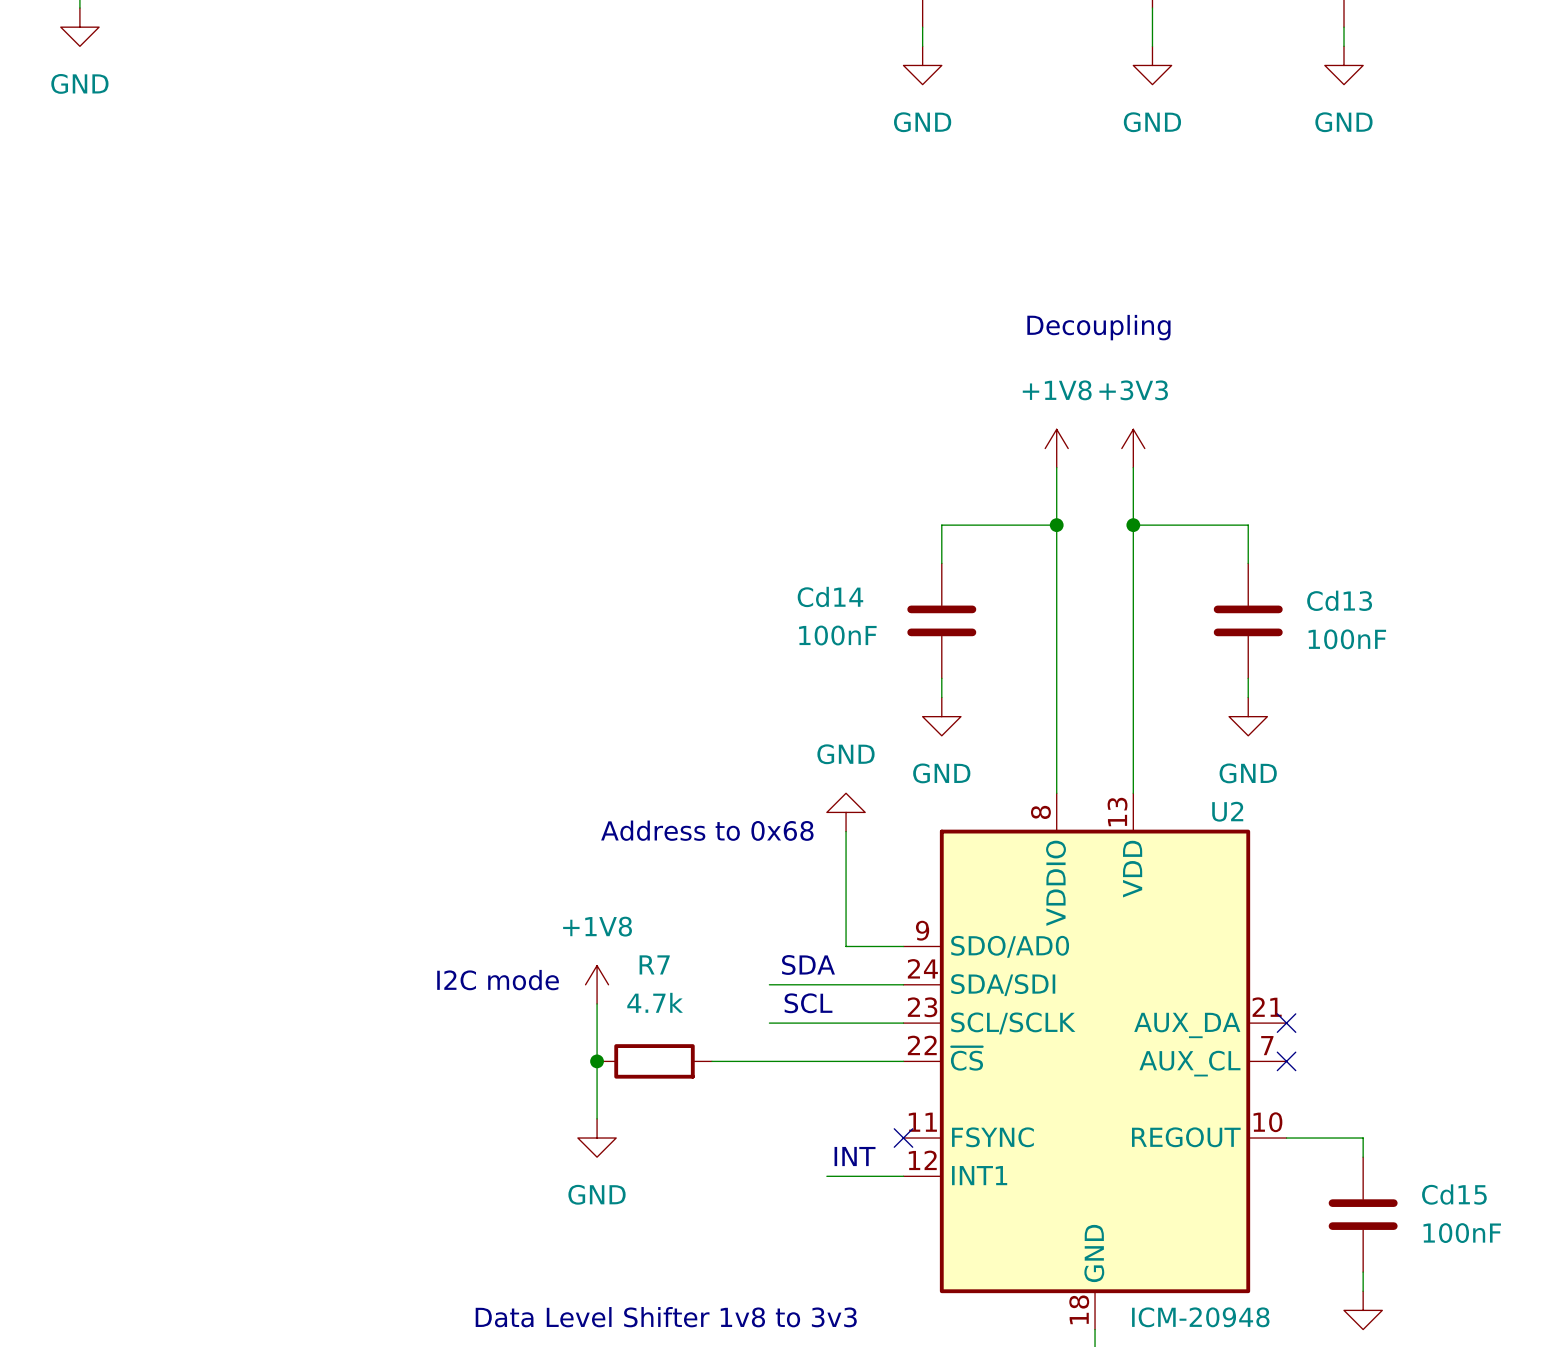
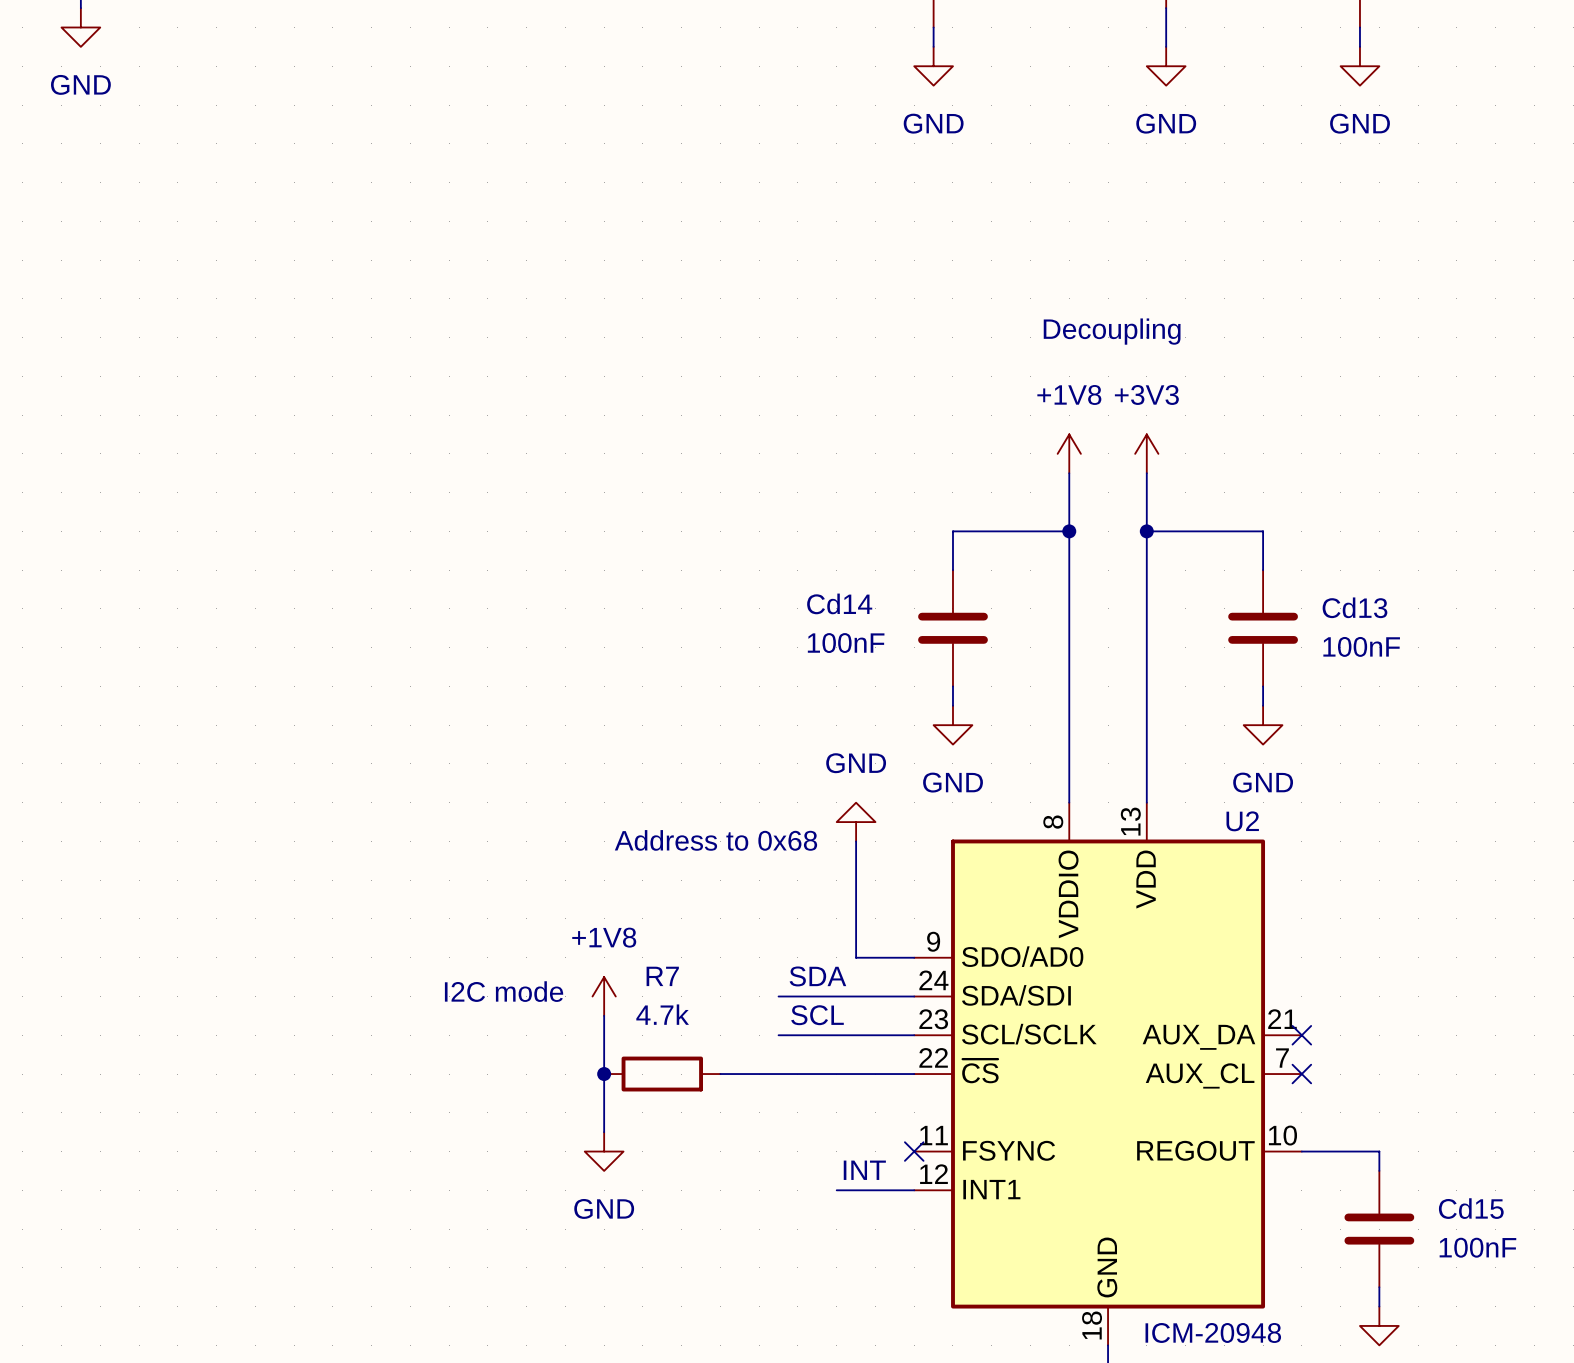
text: Data Level Shifter 1v8 to 3v3 (666, 1317) -> none

